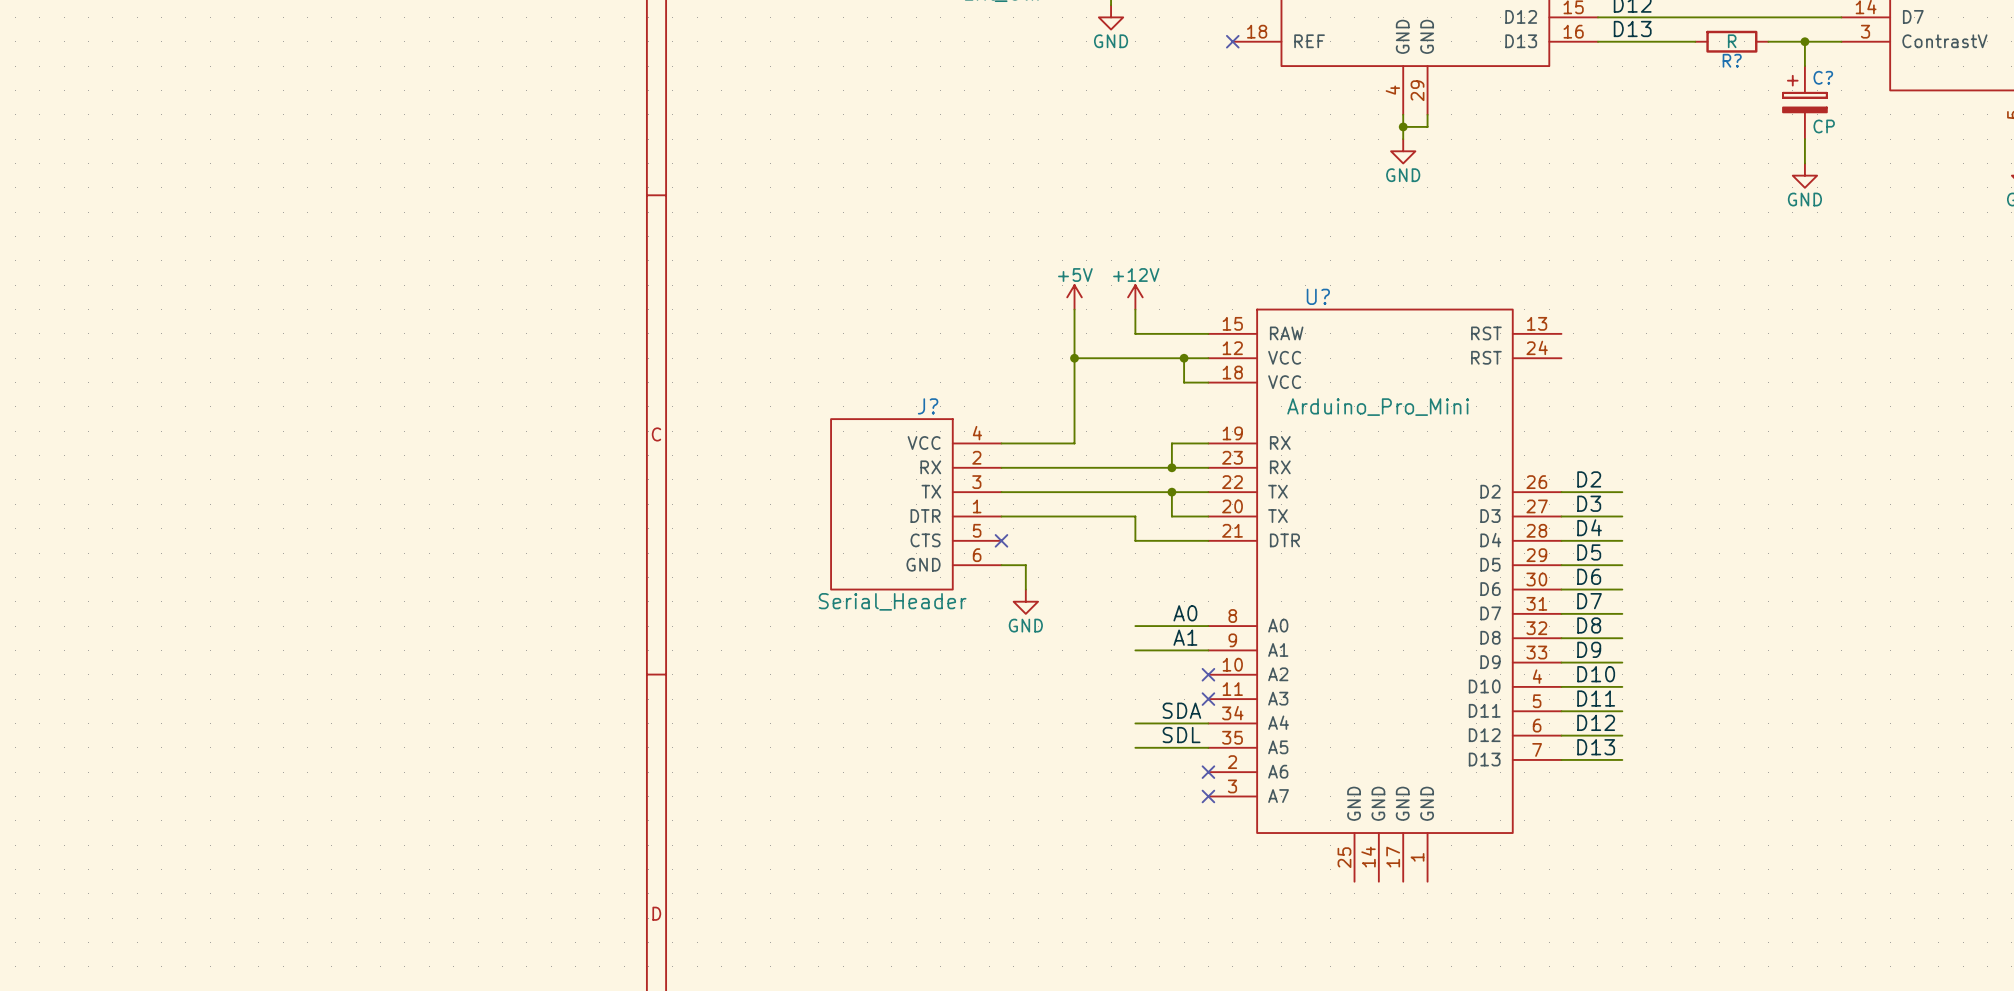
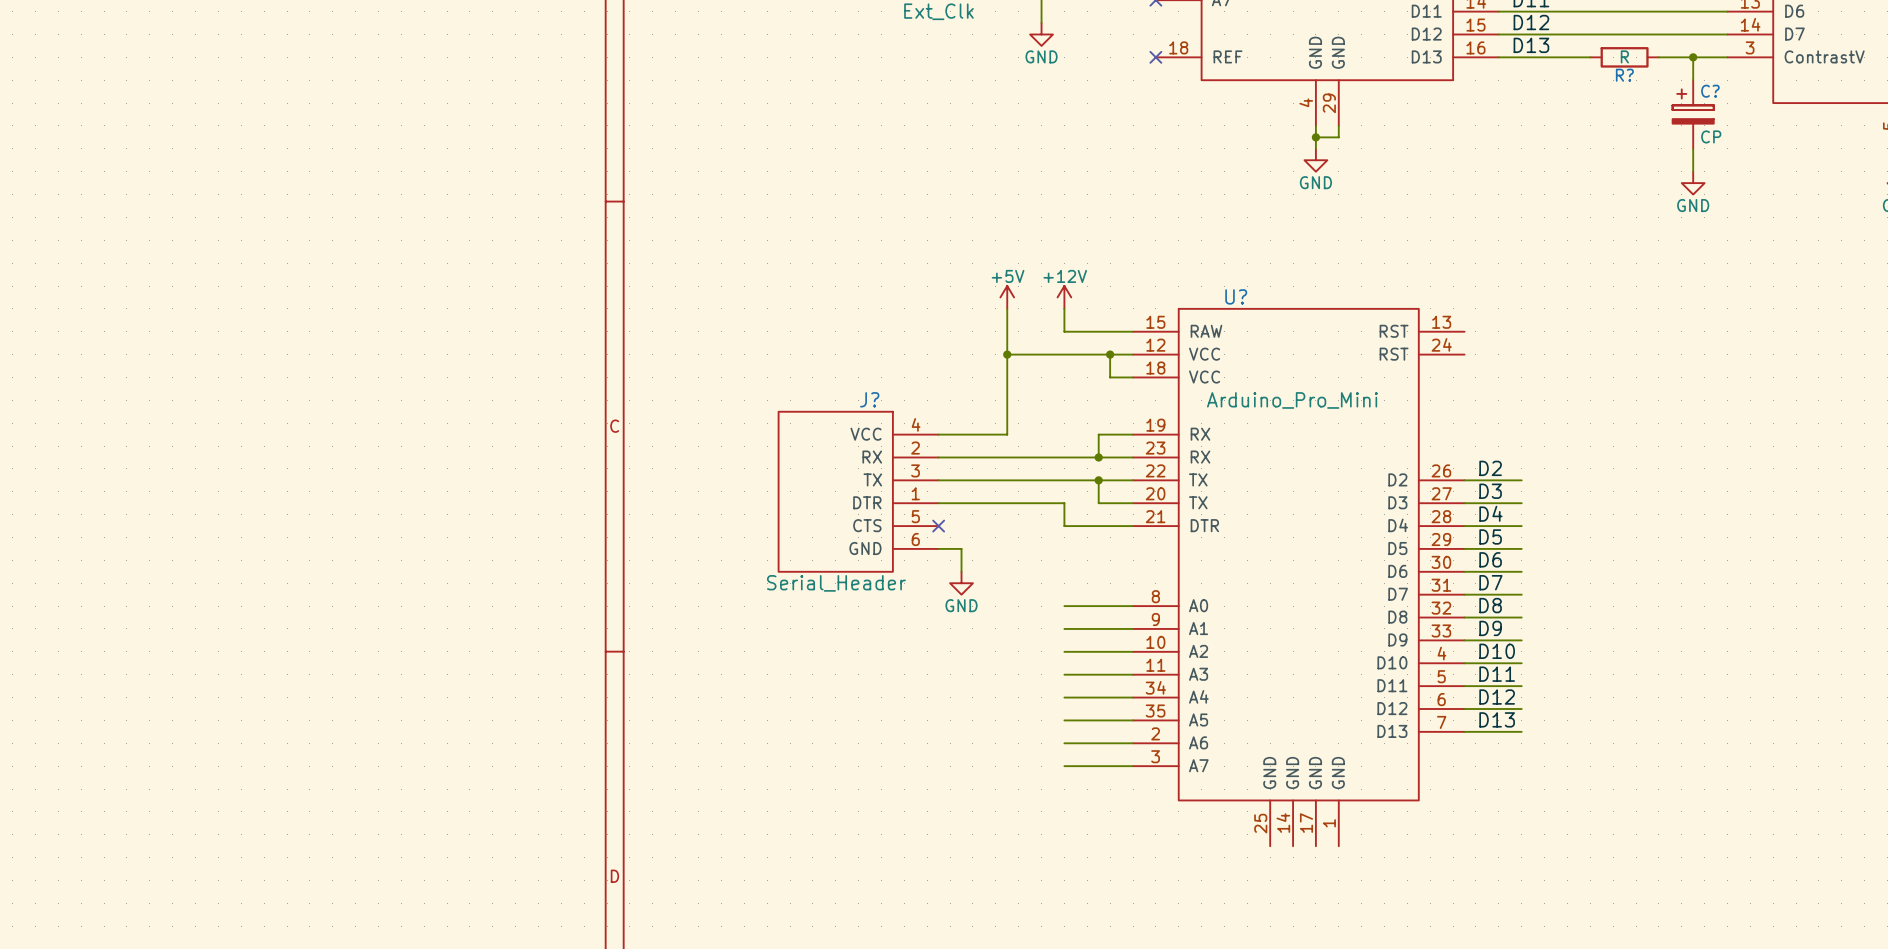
label: A0 (1185, 613) -> none
label: A1 (1185, 637) -> none
wire: none -> (1064, 651) (1133, 651)
no-connect mark: (1208, 674) -> none
wire: none -> (1064, 674) (1133, 674)
no-connect mark: (1208, 699) -> none
label: SDA (1181, 710) -> none
label: SDL (1181, 735) -> none
wire: none -> (1064, 743) (1133, 743)
no-connect mark: (1208, 772) -> none
wire: none -> (1064, 766) (1133, 766)
no-connect mark: (1208, 796) -> none

